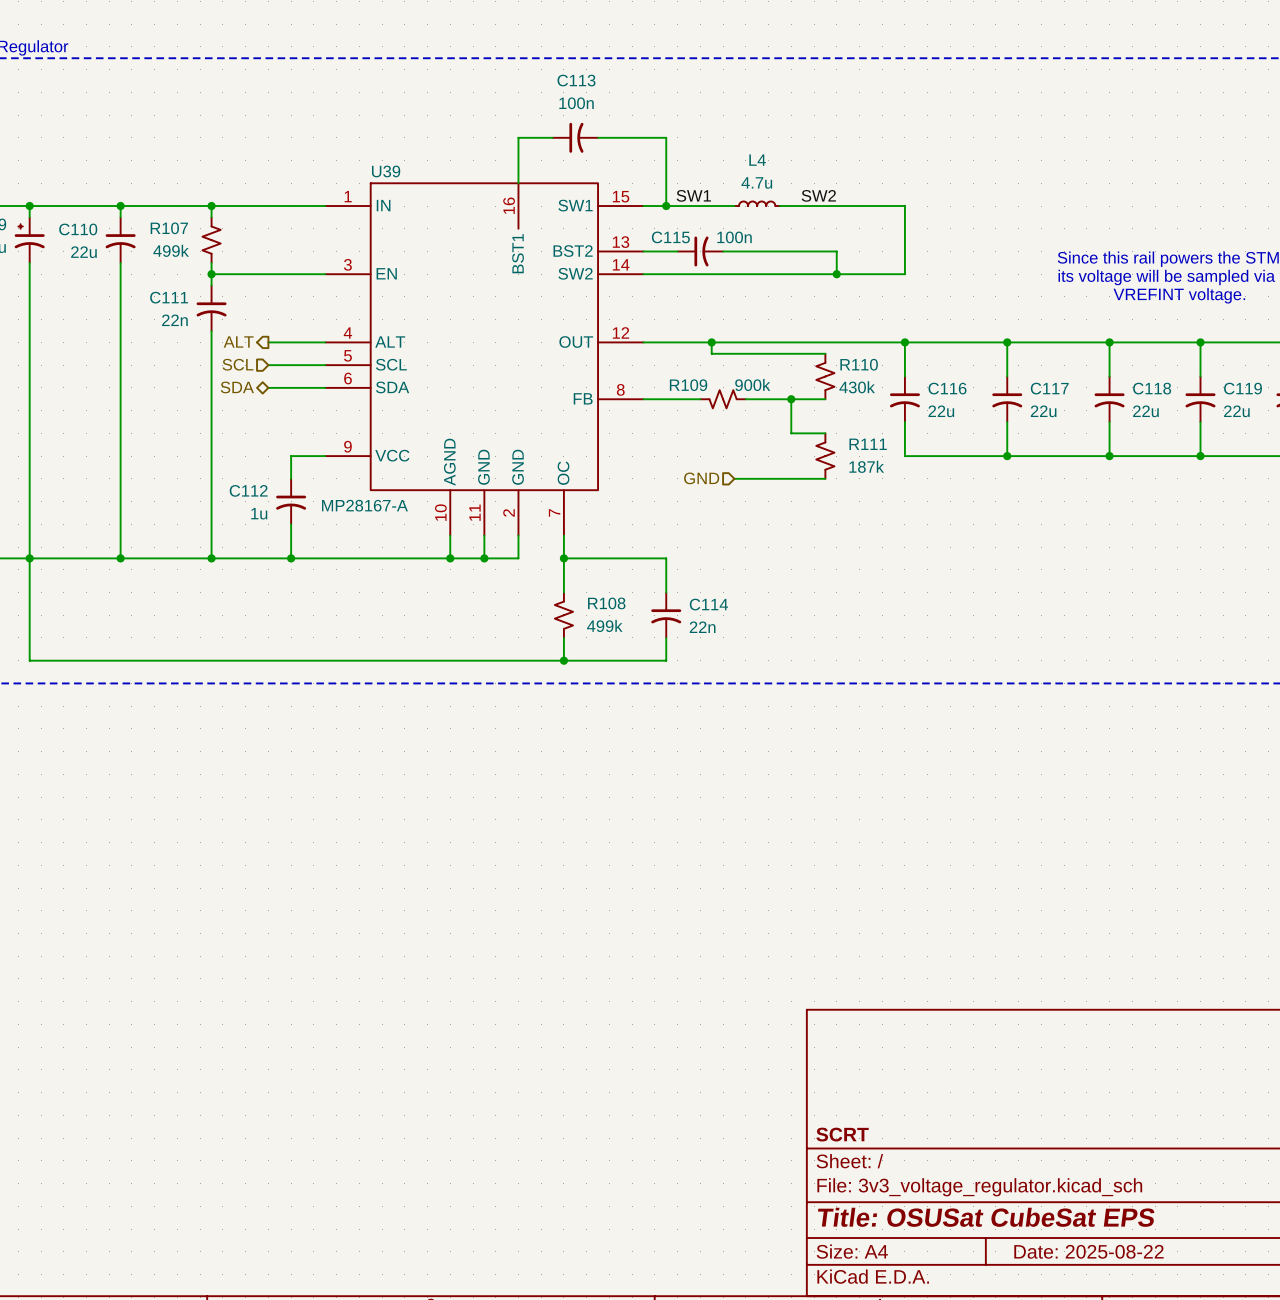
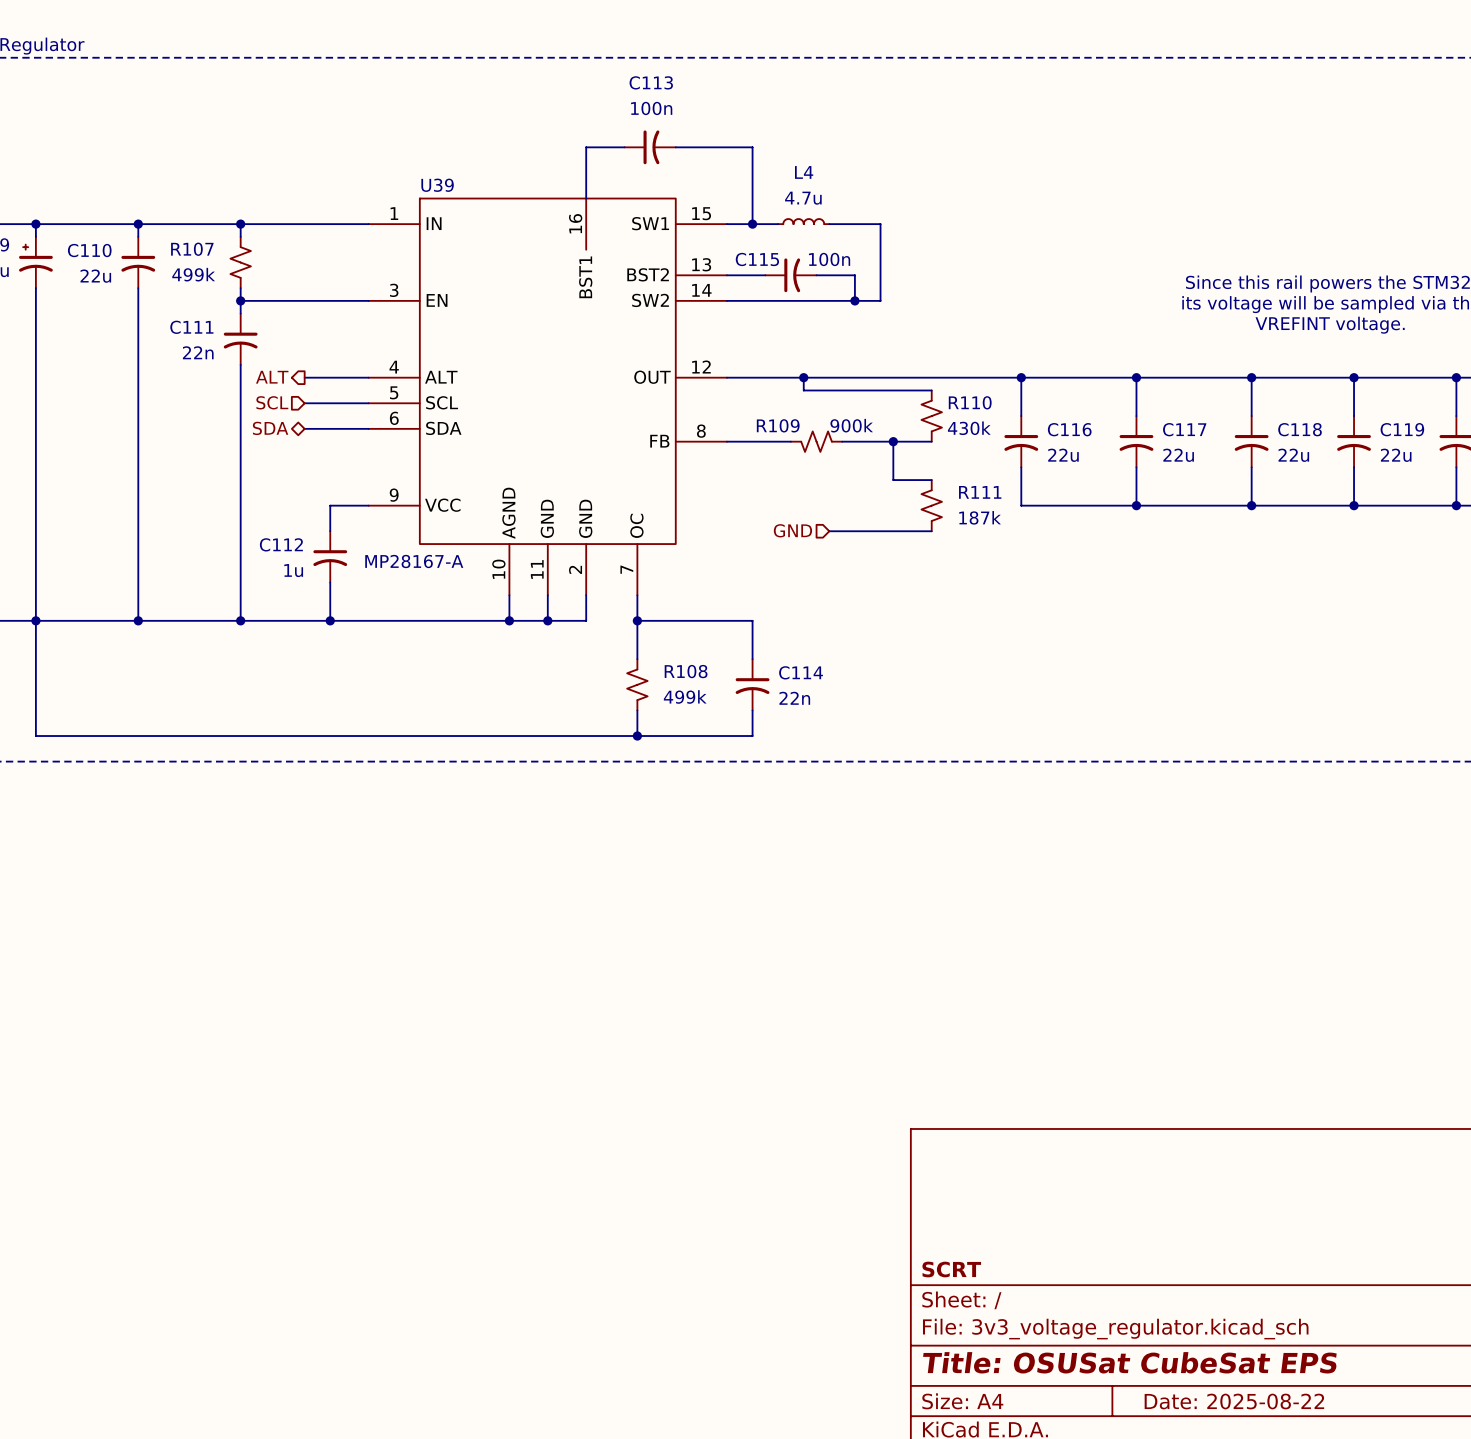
label: SW1 (693, 195) -> none
label: SW2 (818, 195) -> none
L4 position: (757, 203) -> (803, 221)
wire: (688, 206) (734, 206) -> none
wire: (779, 206) (904, 206) (904, 274) (779, 274) -> (829, 224) (880, 224) (880, 300)
wire: (757, 251) (836, 251) (836, 274) -> (854, 275) (854, 300)
junction: none -> (854, 300)
junction: (836, 274) -> none

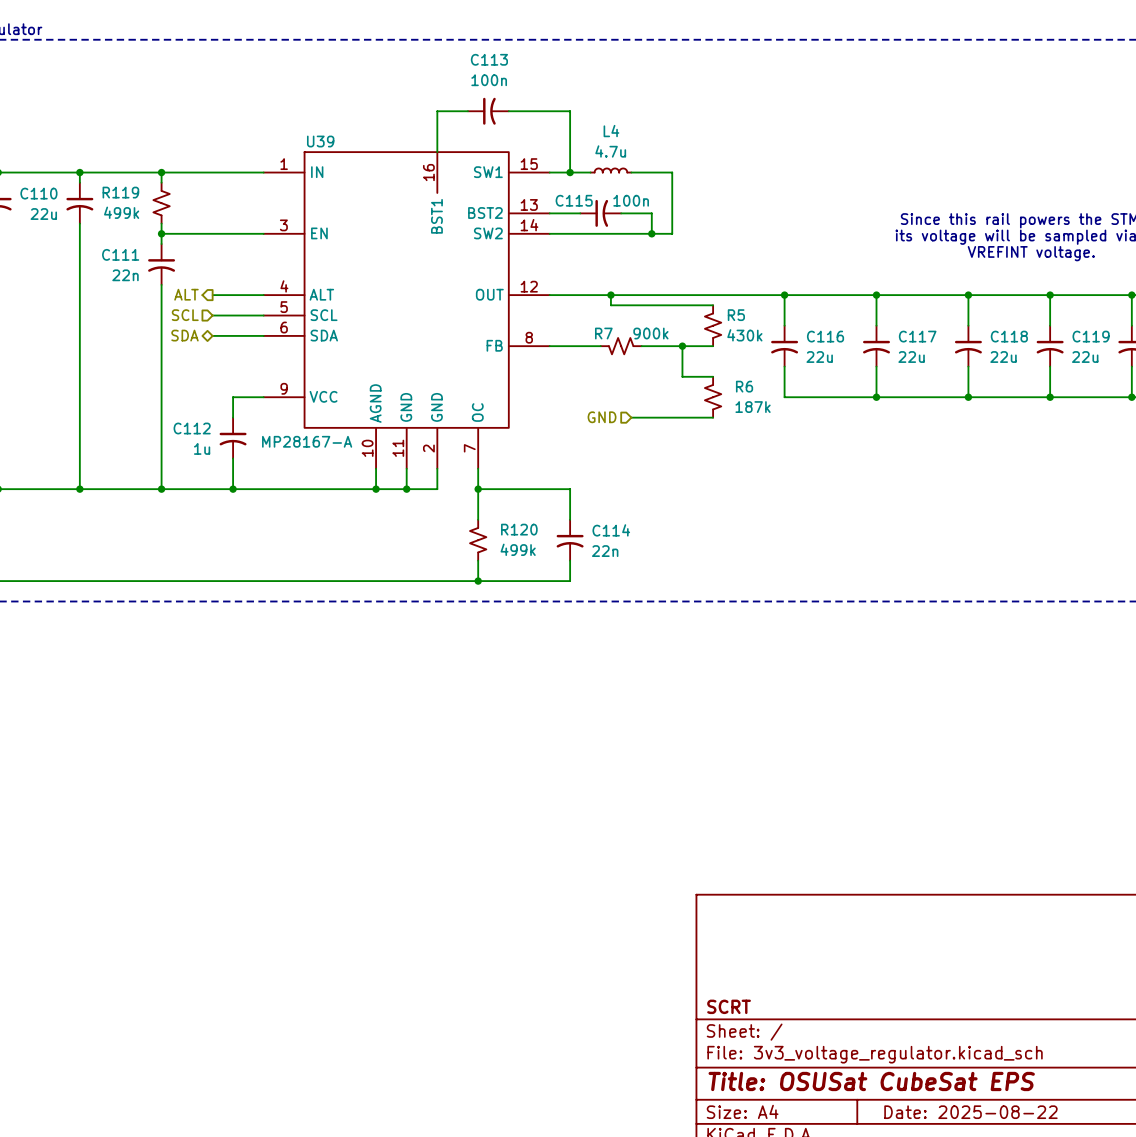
R107 name: R107 (192, 249) -> R119 (120, 192)
R110 name: R110 (970, 402) -> R5 (736, 315)
R109 name: R109 (778, 425) -> R7 (603, 333)
R111 name: R111 (980, 492) -> R6 (744, 386)
R108 name: R108 (686, 671) -> R120 (519, 529)

